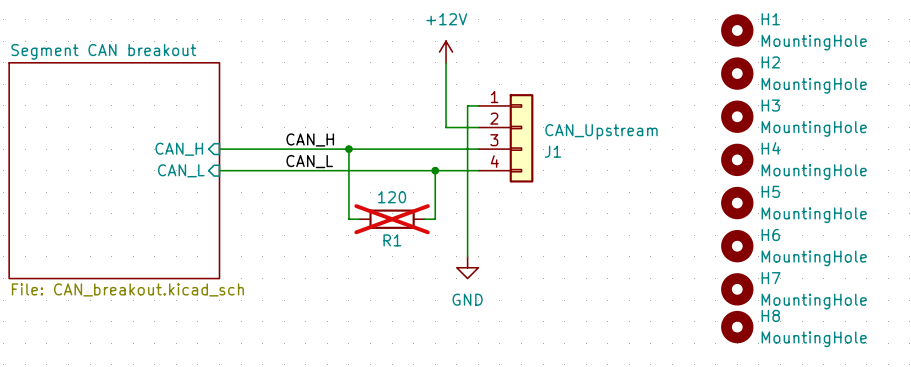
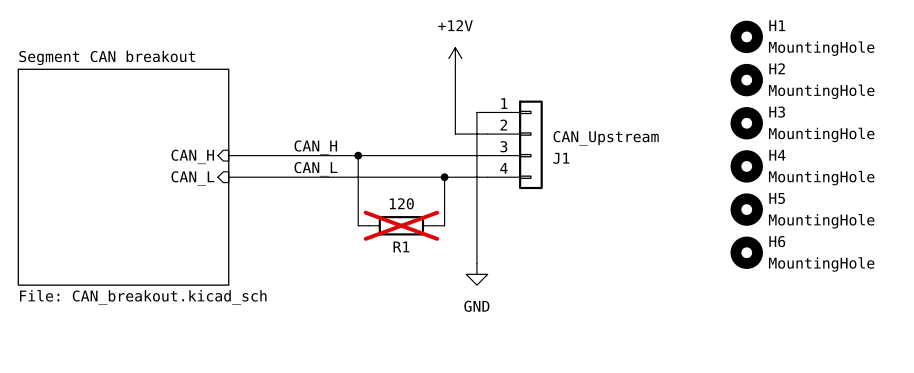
H7: MountingHole (737, 289) -> none
H8: MountingHole (737, 327) -> none

